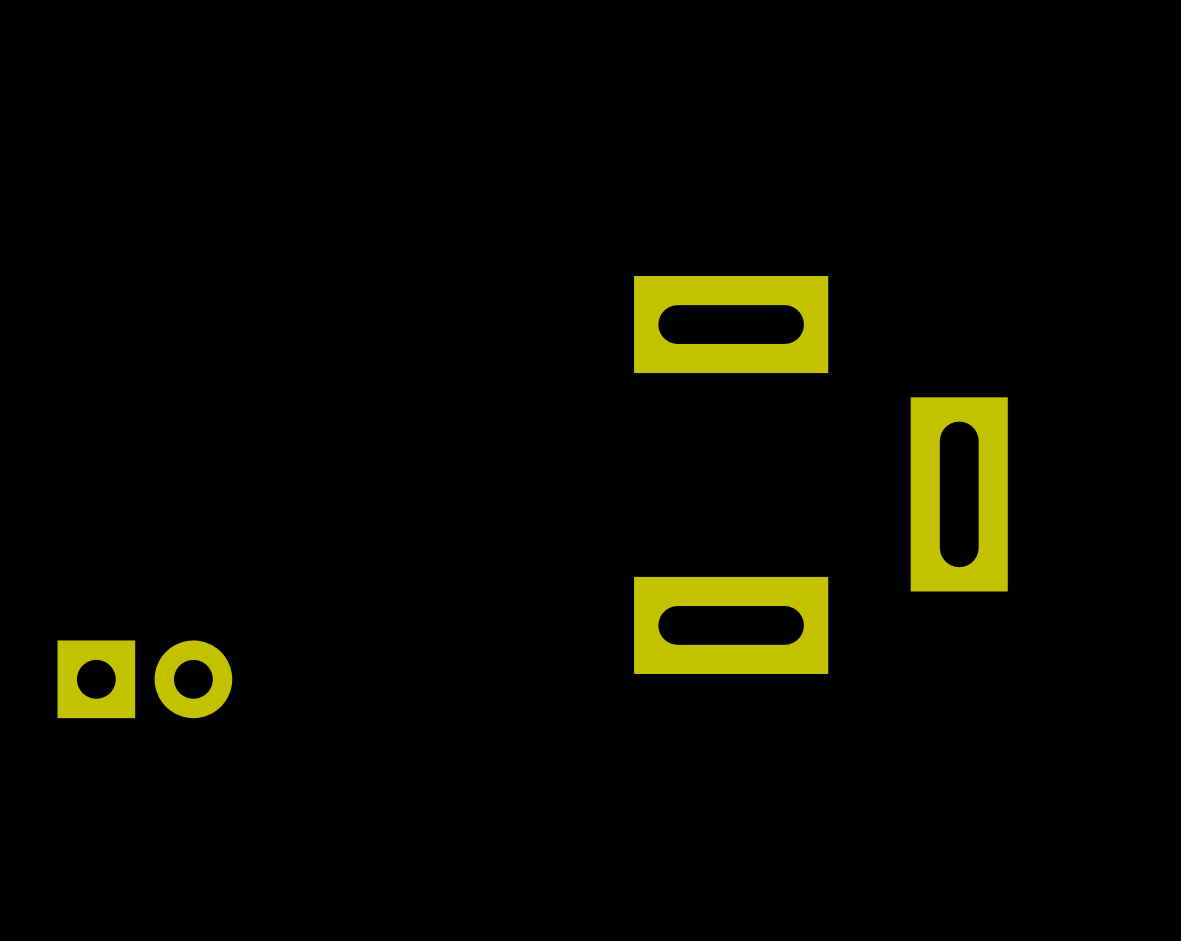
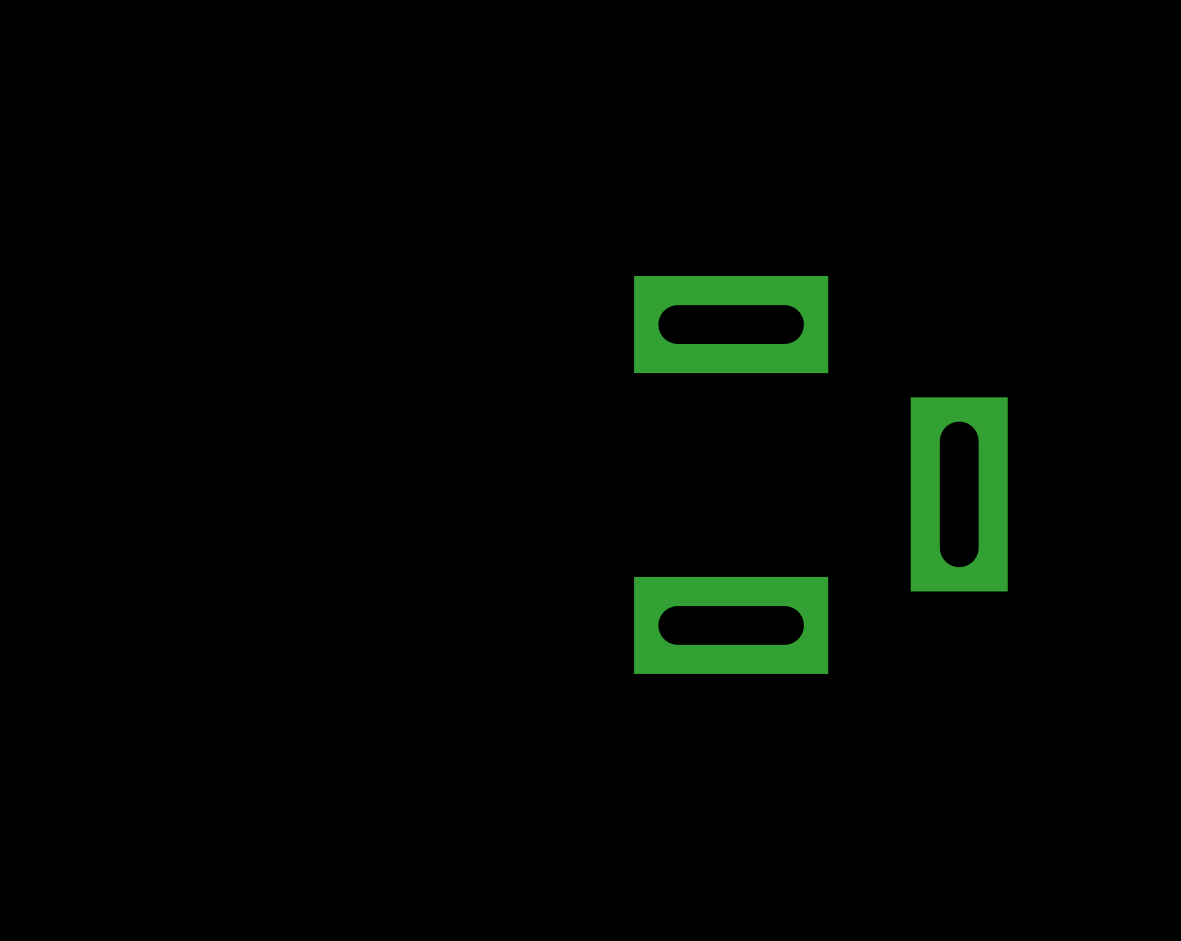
part: (144, 679) -> none

